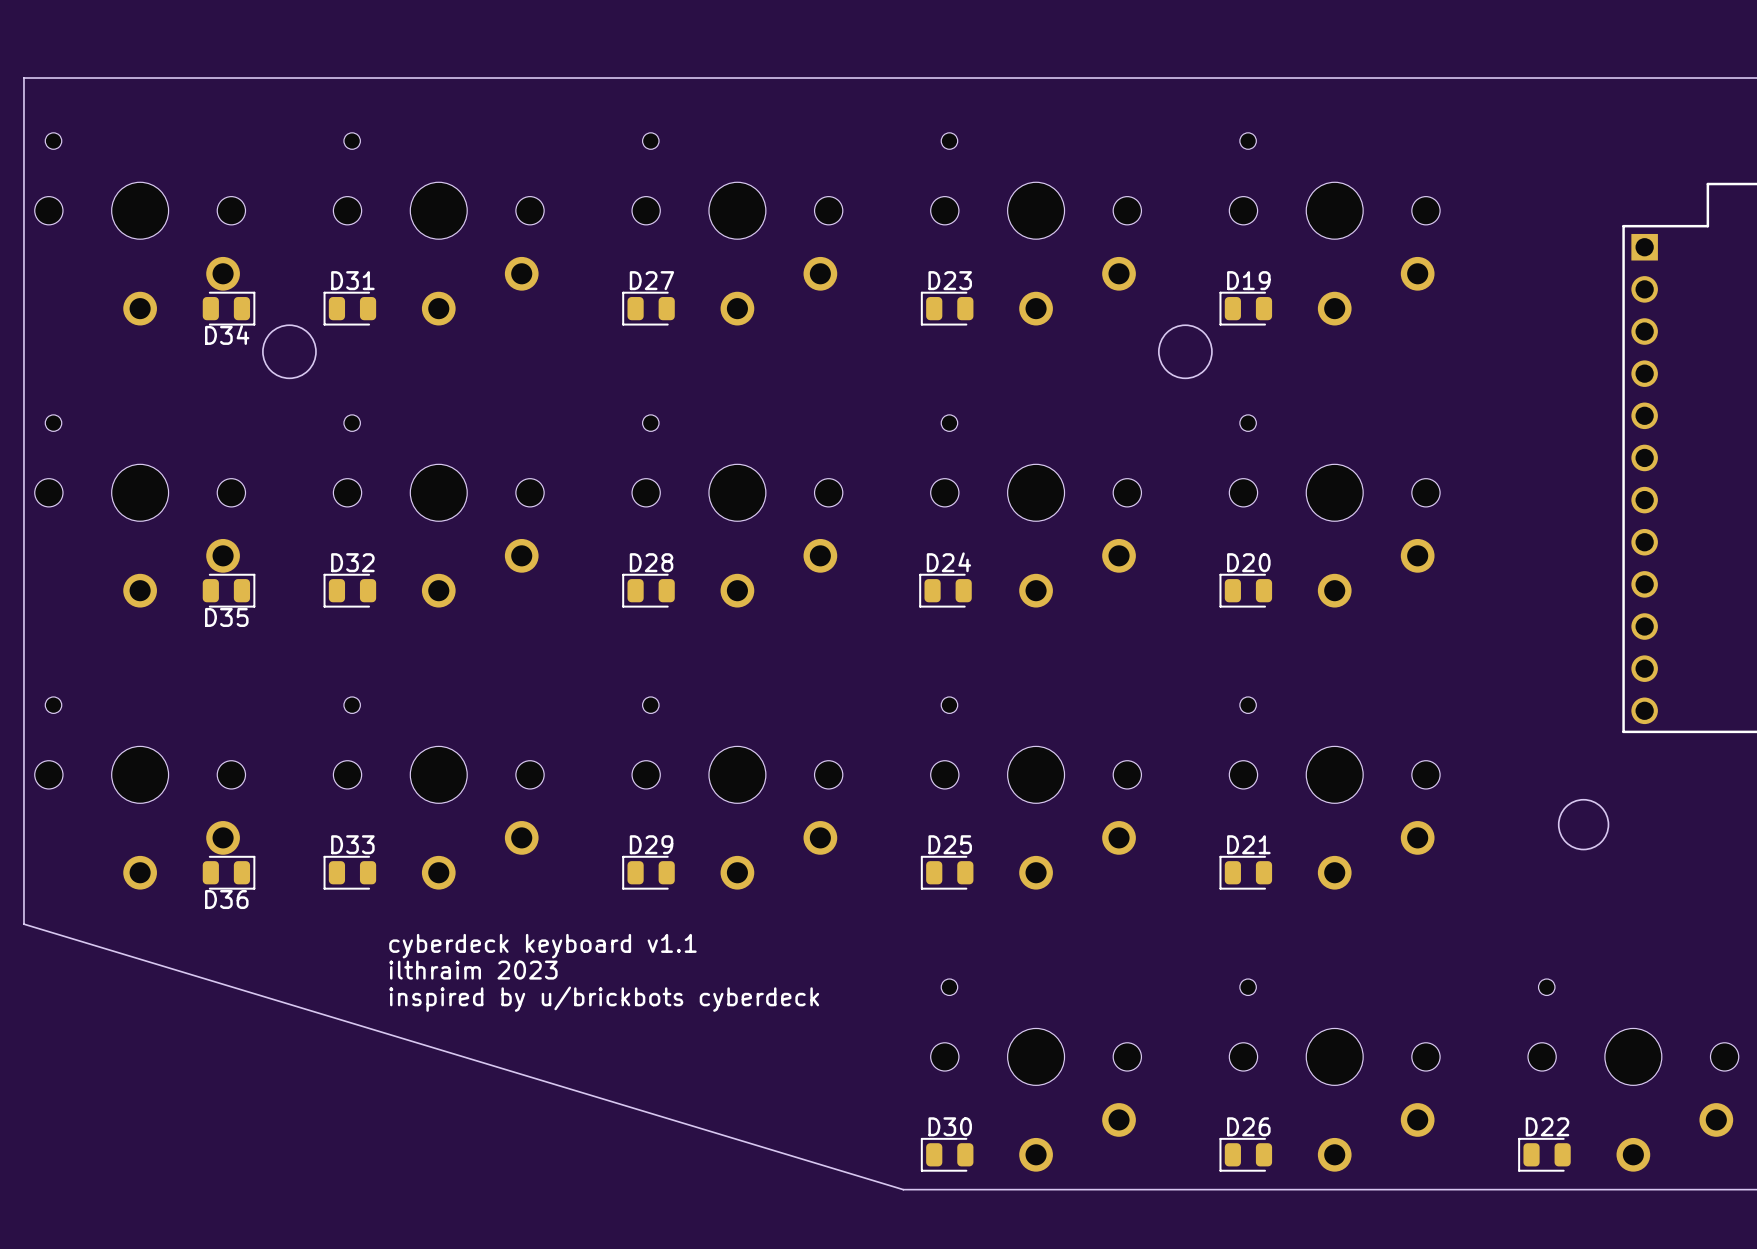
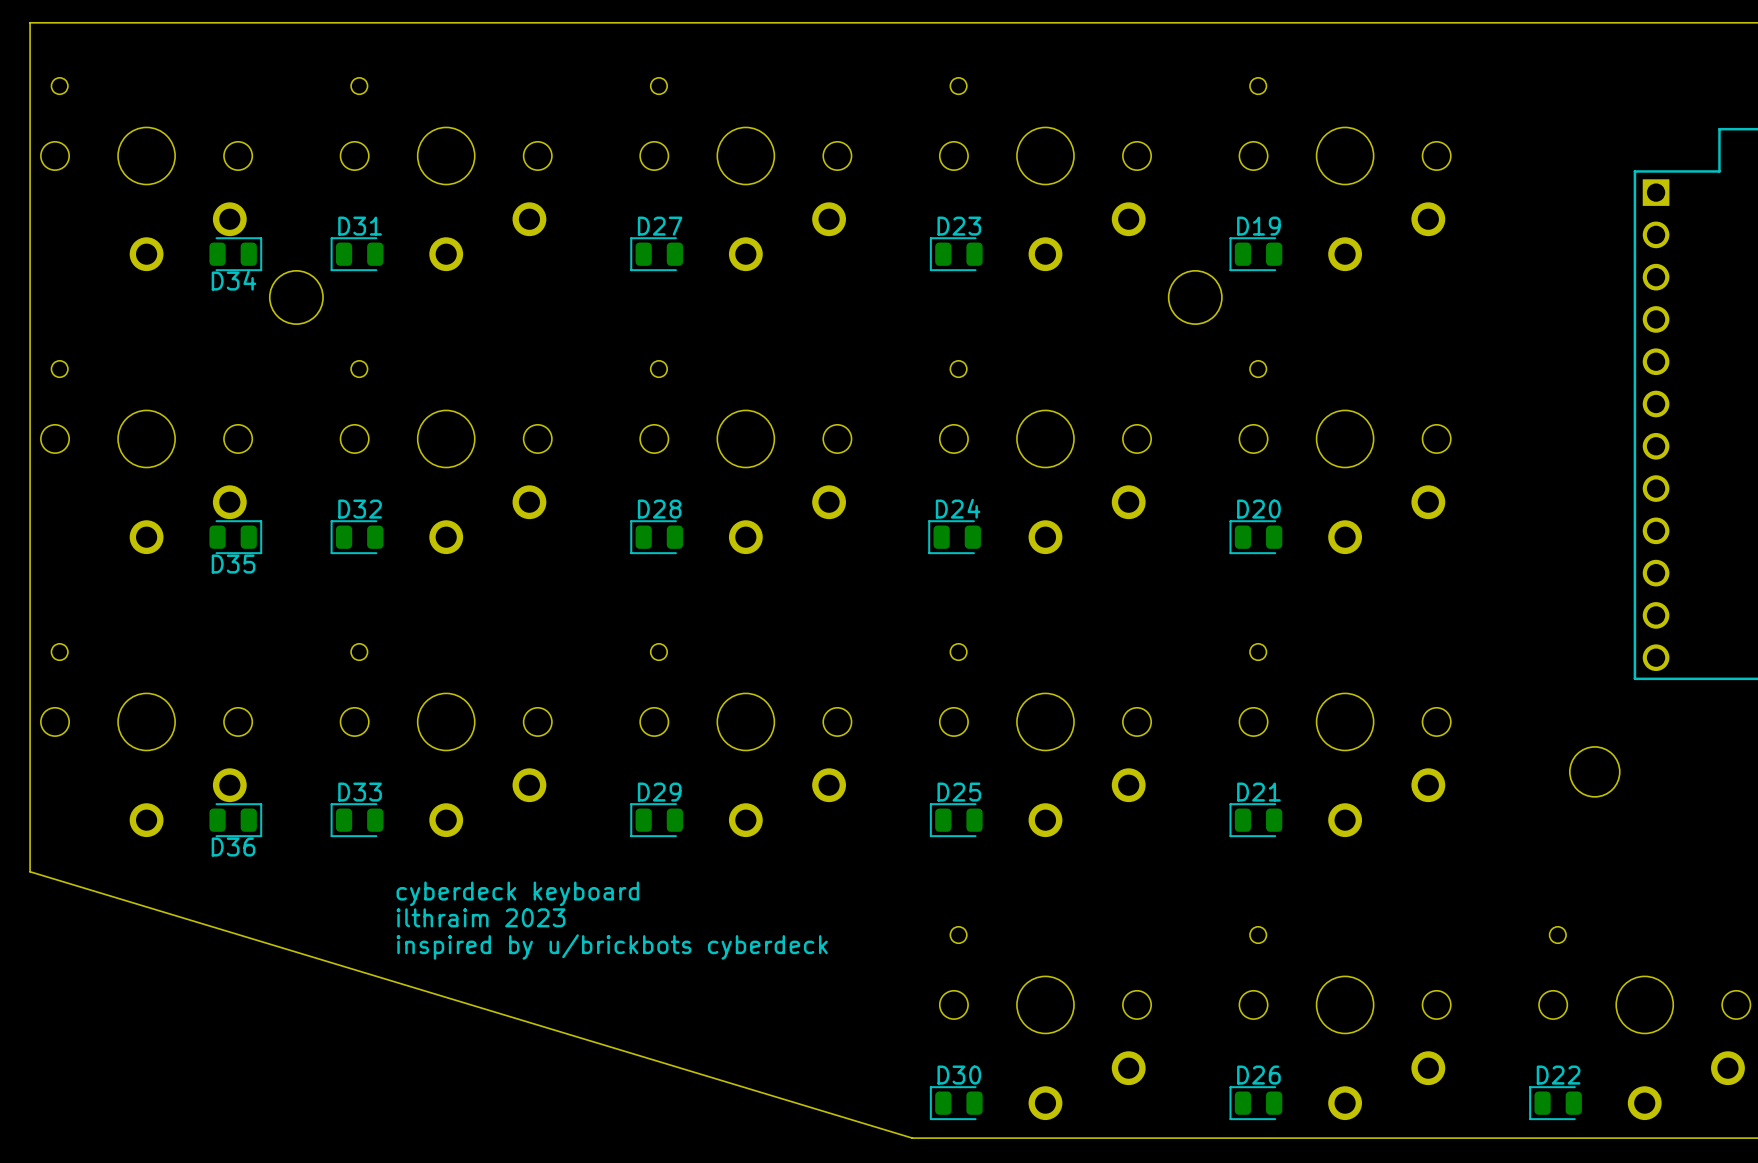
text: cyberdeck keyboard v1.1 (542, 946) -> cyberdeck keyboard (517, 893)

